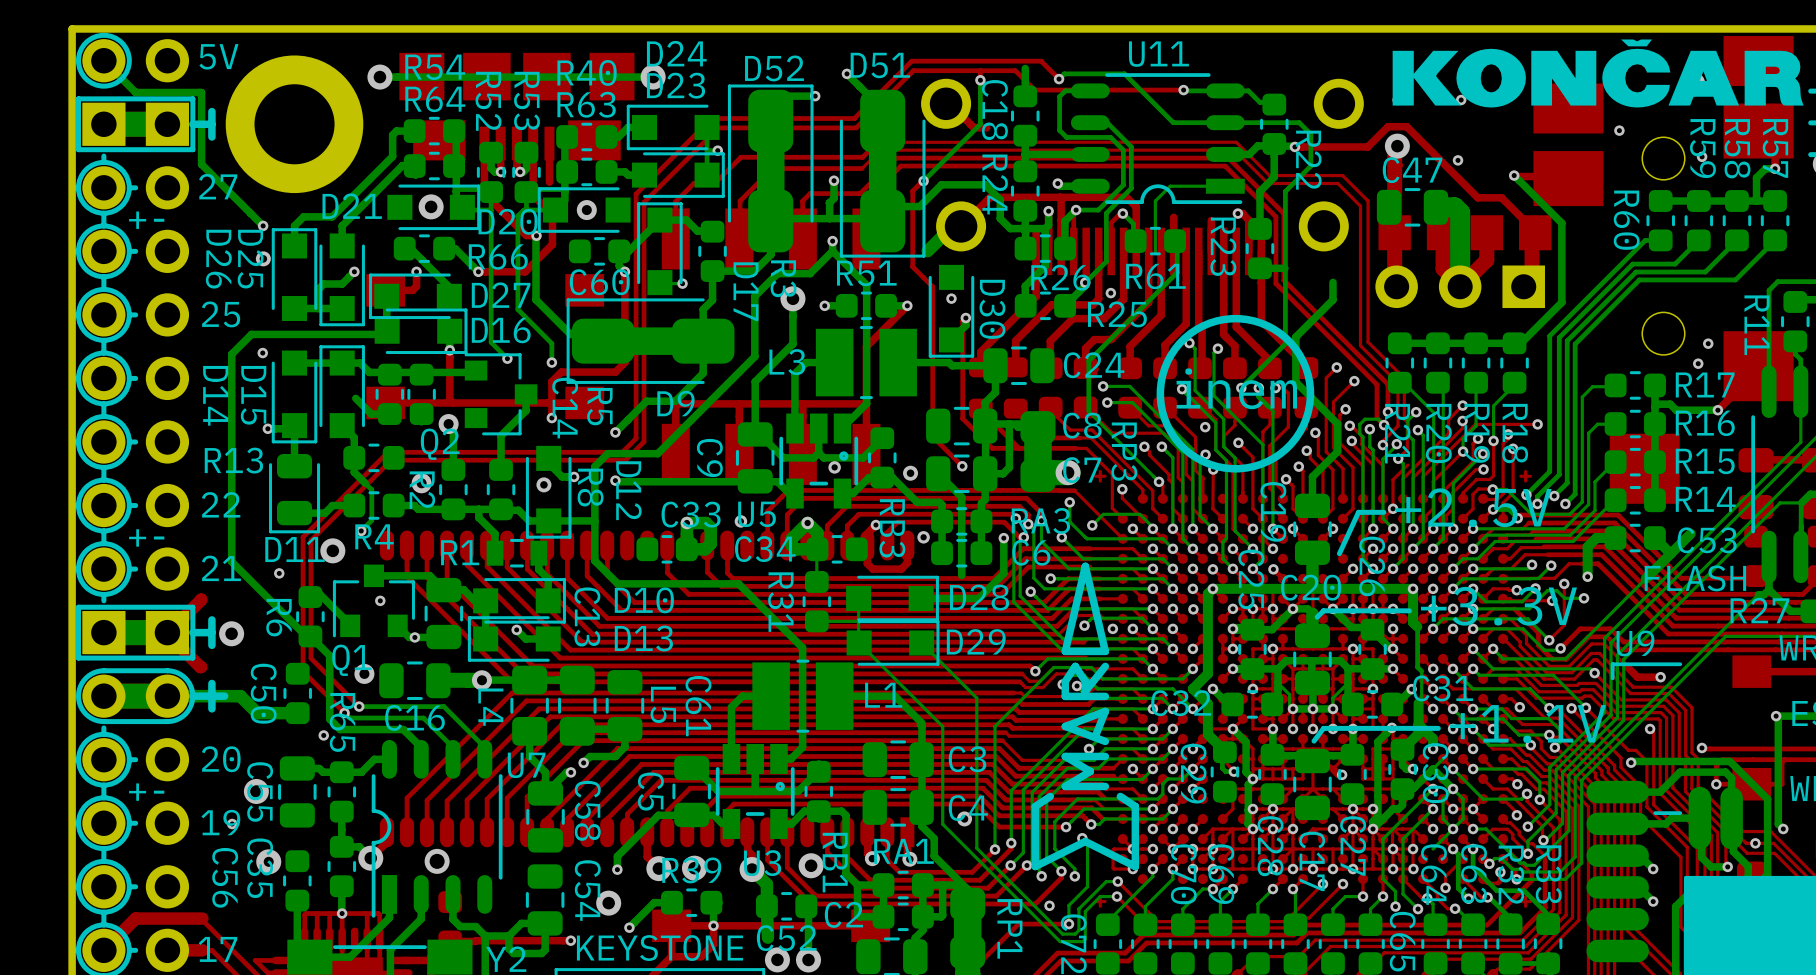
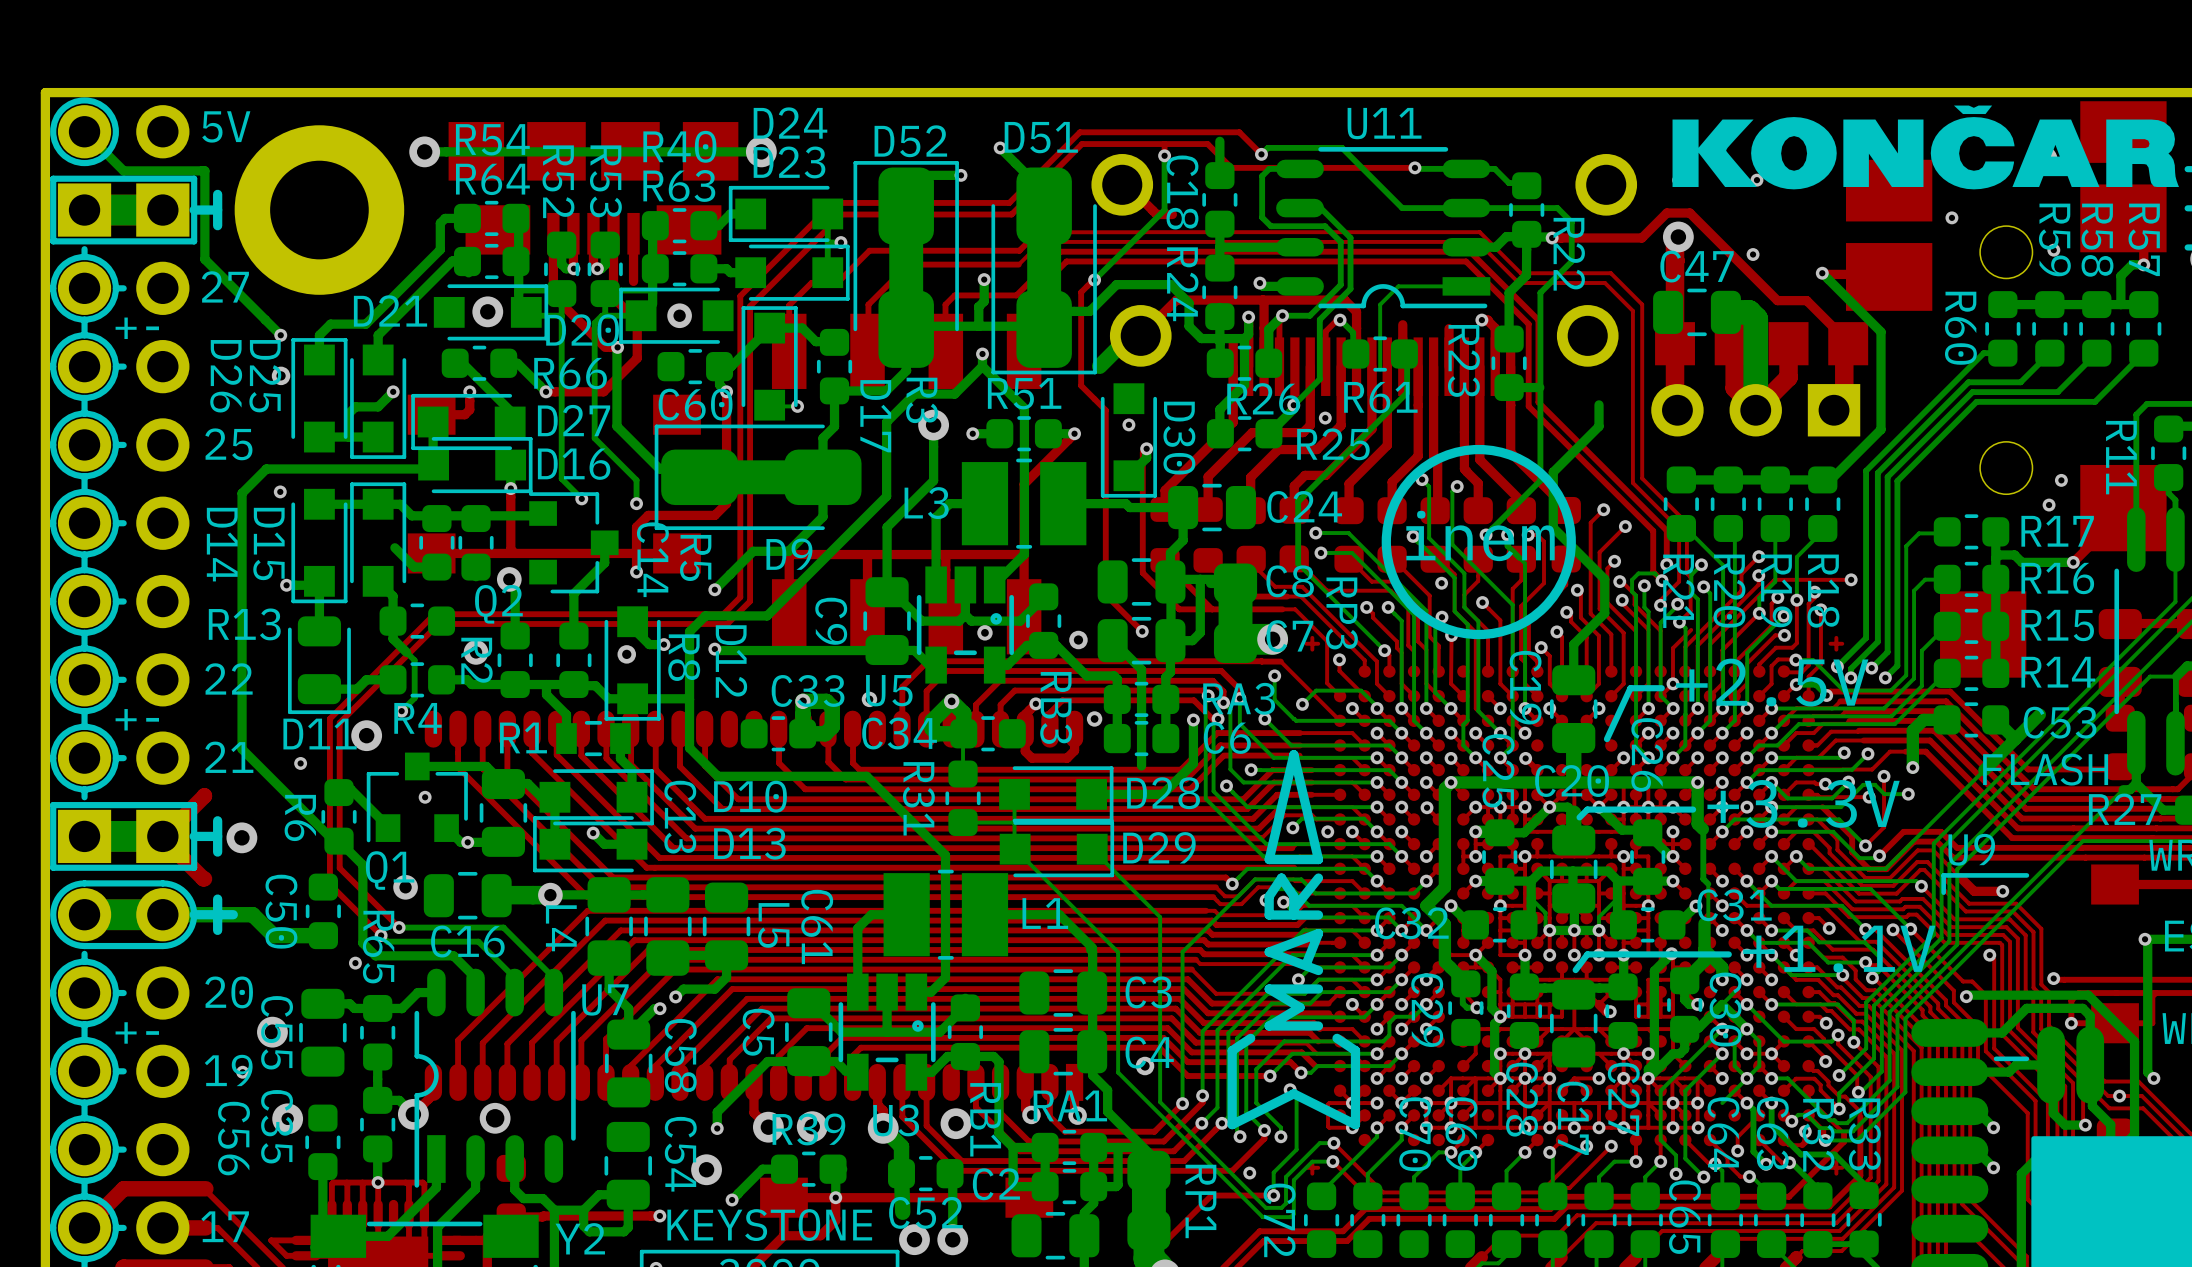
bottom track: (1575, 835) (1575, 856) (1560, 871) (1539, 871) -> (1897, 1086) (1852, 1131)
bottom track: (1581, 840) (1581, 863) (1565, 879) (1542, 879) -> (1905, 1092) (1857, 1140)

